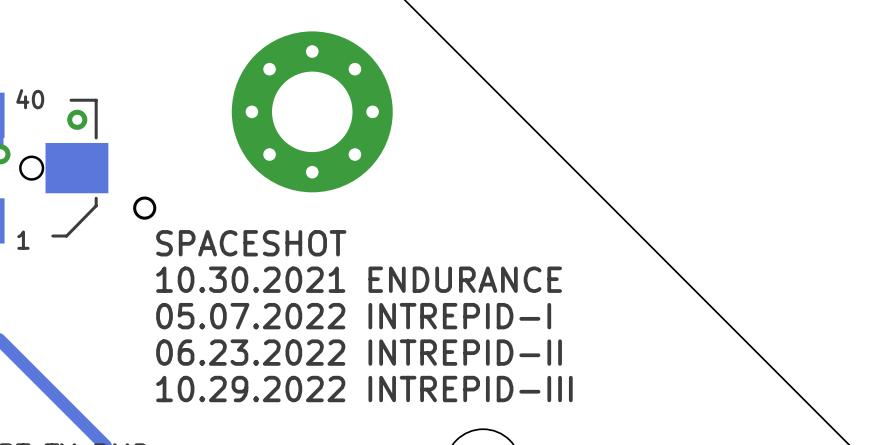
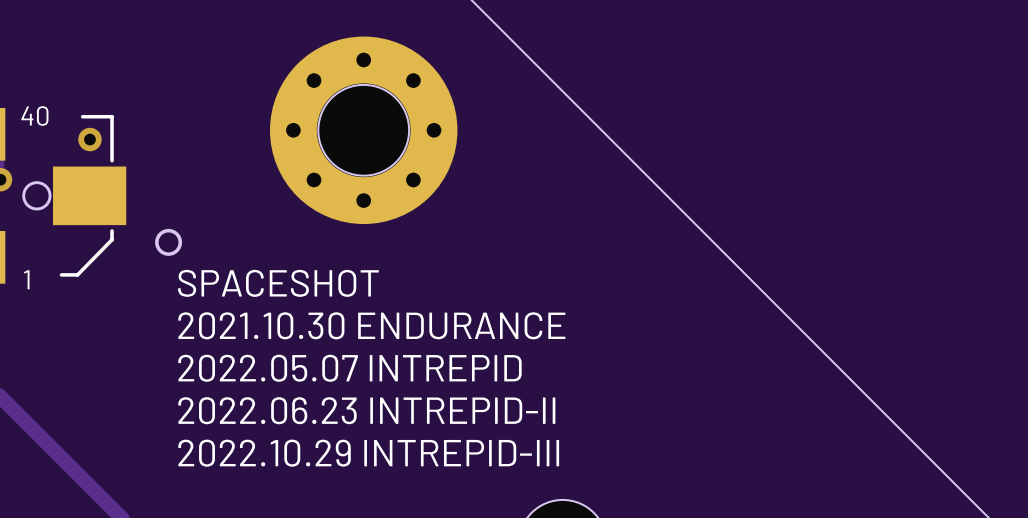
round board edge: none -> [318, 84, 410, 176]
text: 10.30.2021 ENDURANCE (359, 279) -> 2021.10.30 ENDURANCE (371, 325)
text: 05.07.2022 INTREPID-I (353, 316) -> 2022.05.07 INTREPID (350, 368)
text: 06.23.2022 INTREPID-II (359, 352) -> 2022.06.23 INTREPID-II (366, 410)
text: 10.29.2022 INTREPID-III (364, 389) -> 2022.10.29 INTREPID-III (368, 453)

